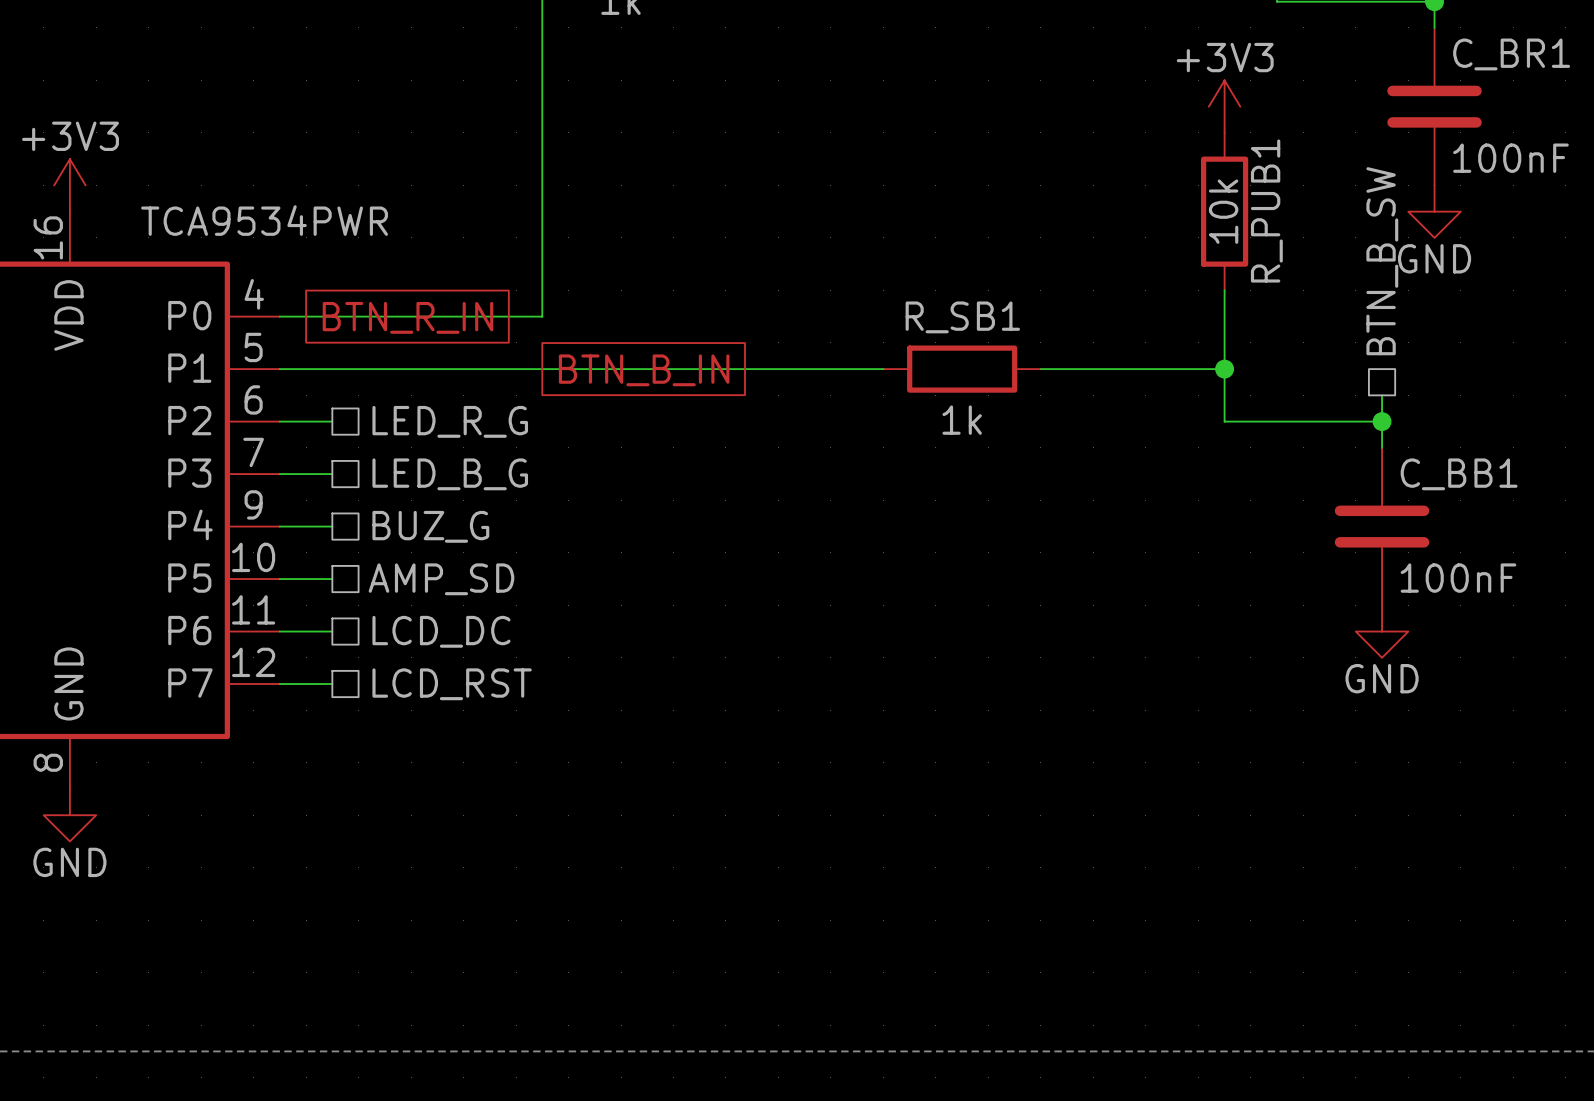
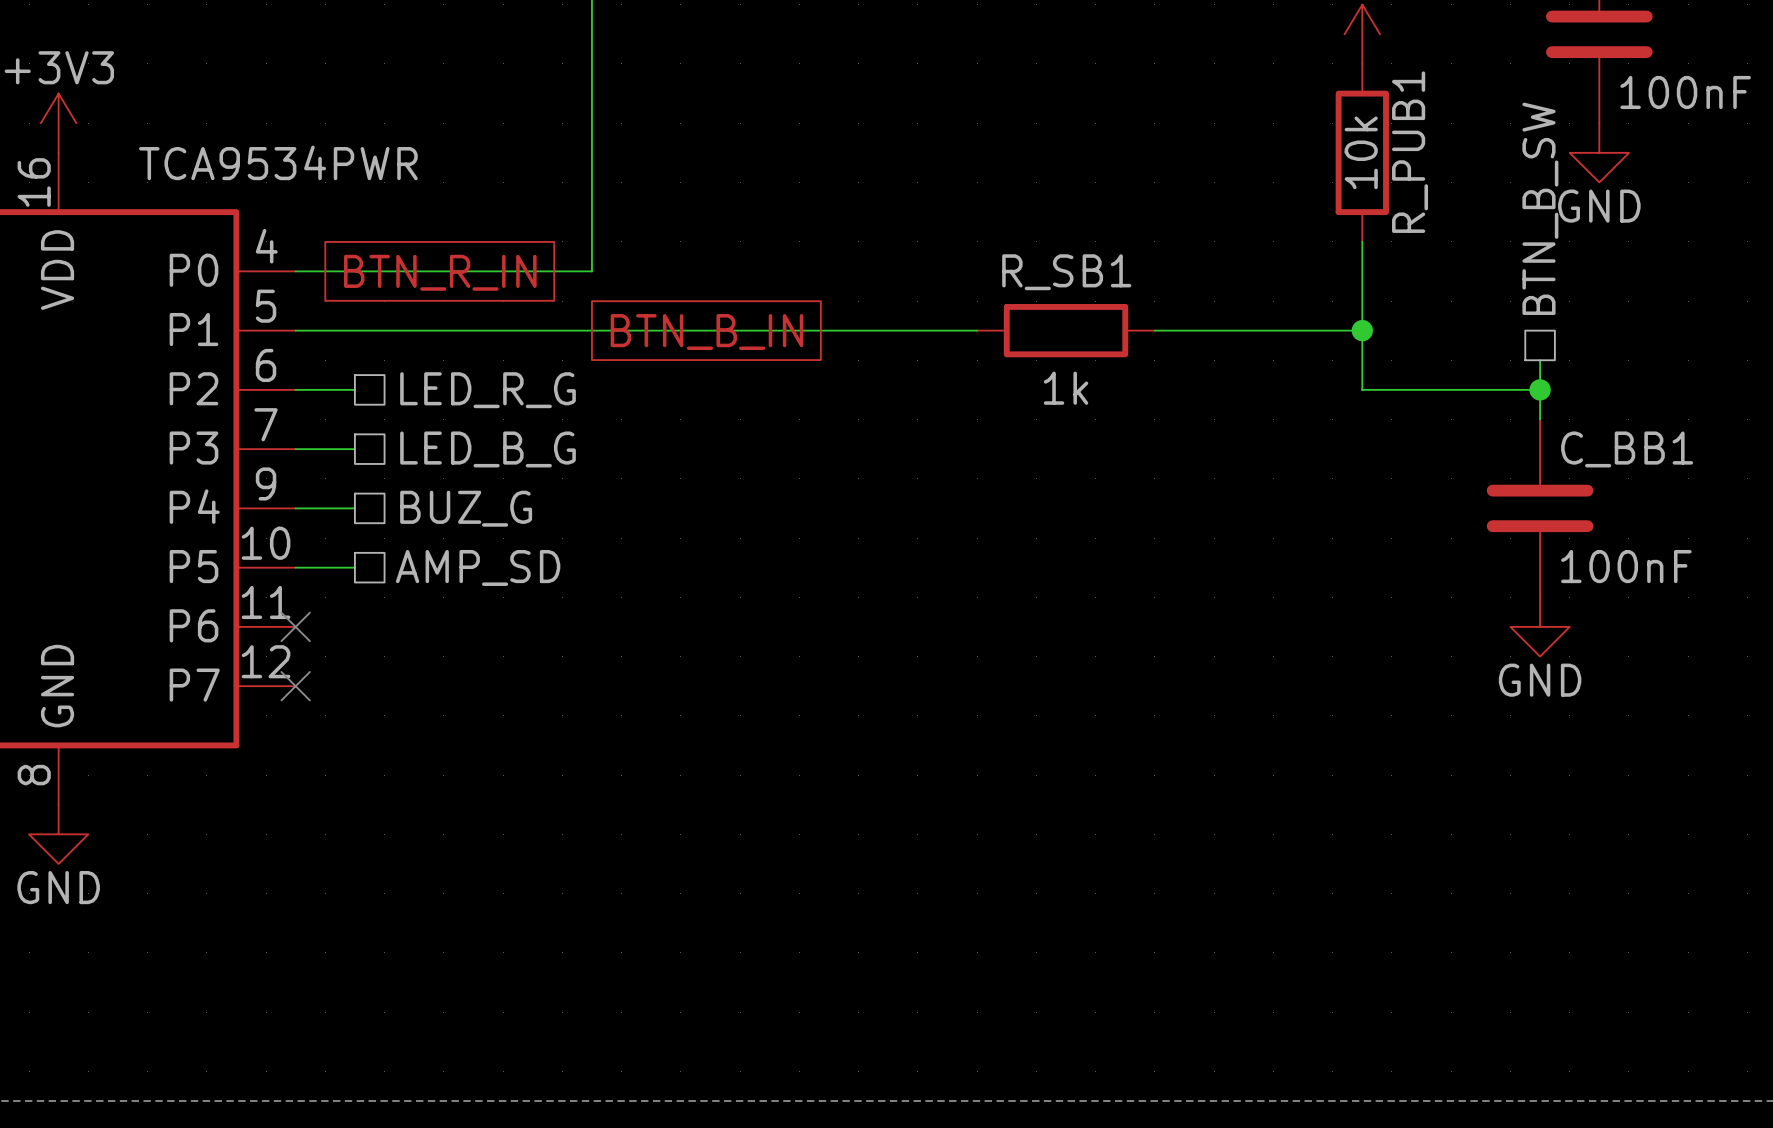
wire: (279, 631) (332, 631) -> none
no-connect mark: none -> (295, 626)
hierarchical label: LCD_DC (441, 631) -> none
wire: (279, 684) (332, 684) -> none
no-connect mark: none -> (295, 686)
hierarchical label: LCD_RST (452, 684) -> none

